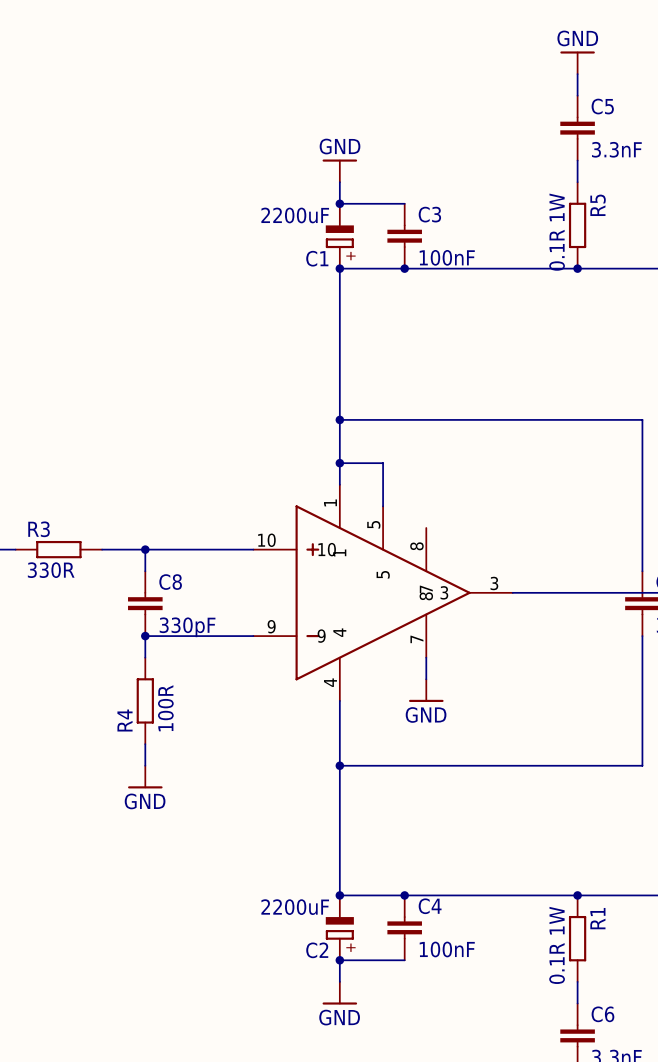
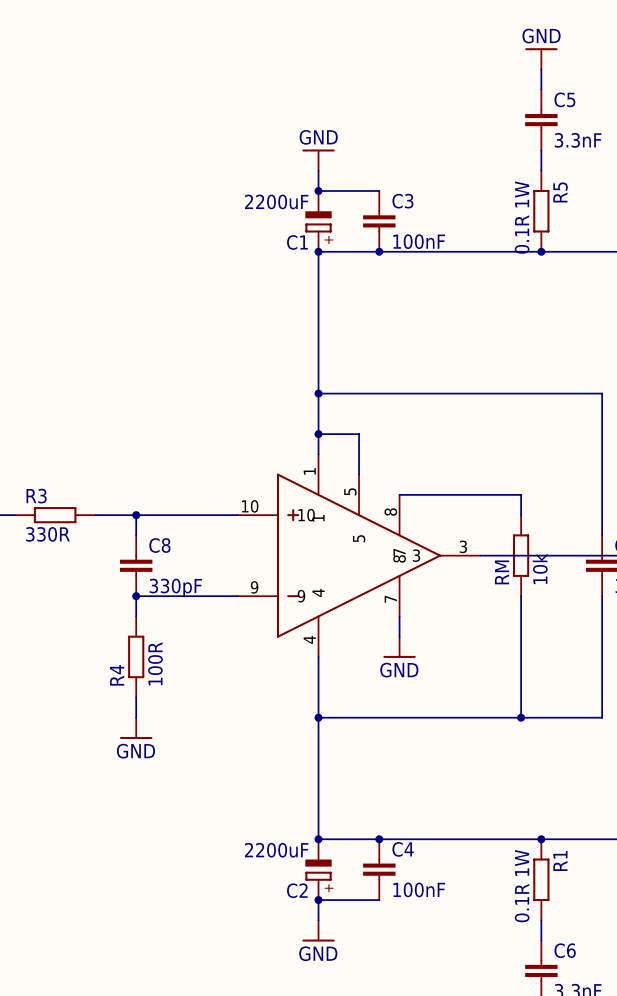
wire: none -> (399, 494) (521, 494) (521, 515)
RM: none -> 10k (521, 555)
wire: none -> (521, 596) (521, 717)
junction: none -> (521, 717)

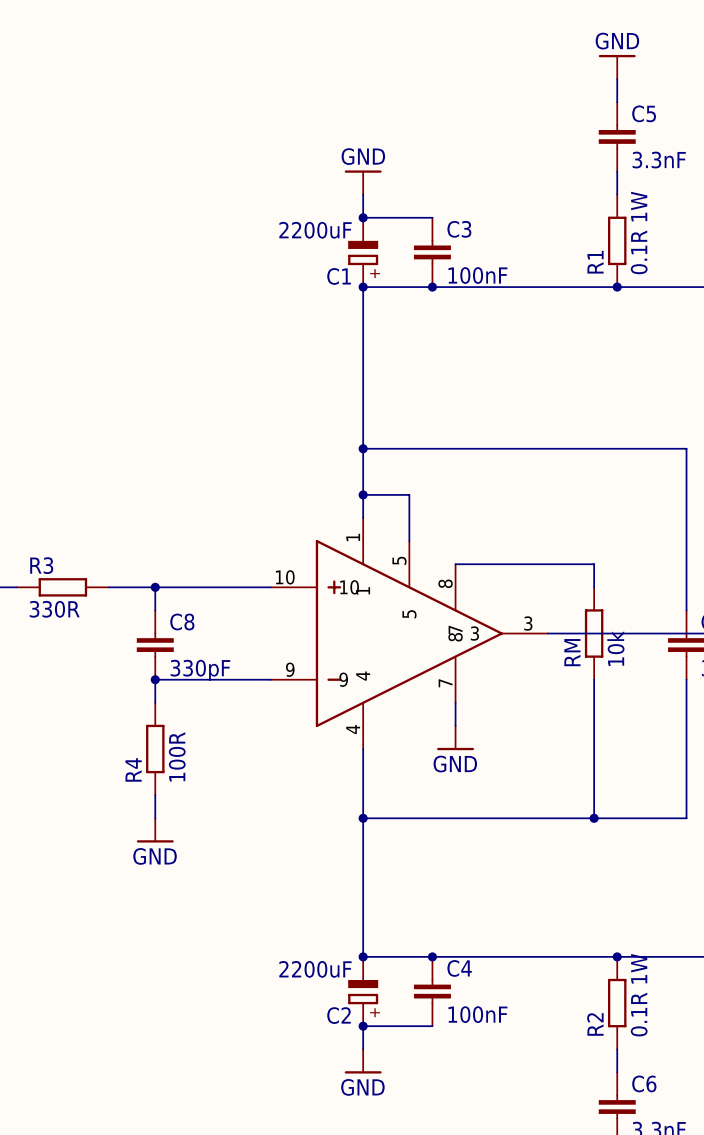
R5 name: R5 (560, 192) -> R1 (595, 262)
R5 value position: 0.1R 1W (522, 217) -> 0.1R 1W (639, 232)
R1 name: R1 (560, 860) -> R2 (595, 1024)
R1 value position: 0.1R 1W (522, 886) -> 0.1R 1W (639, 995)

